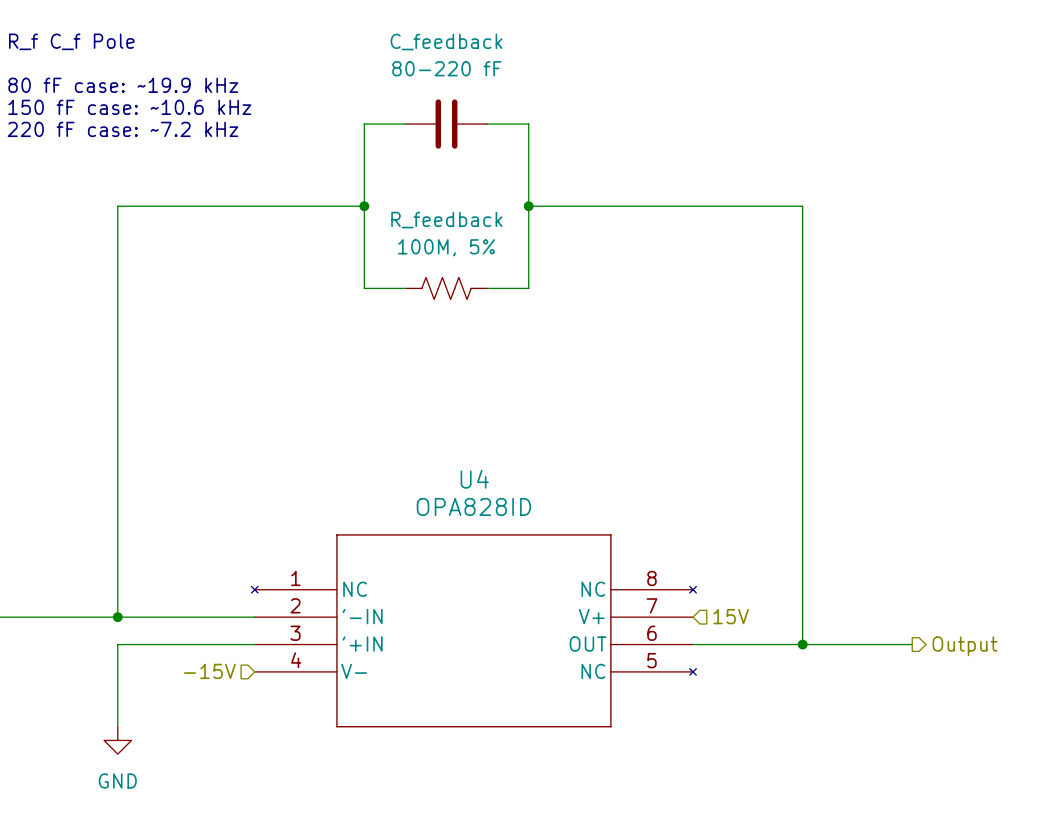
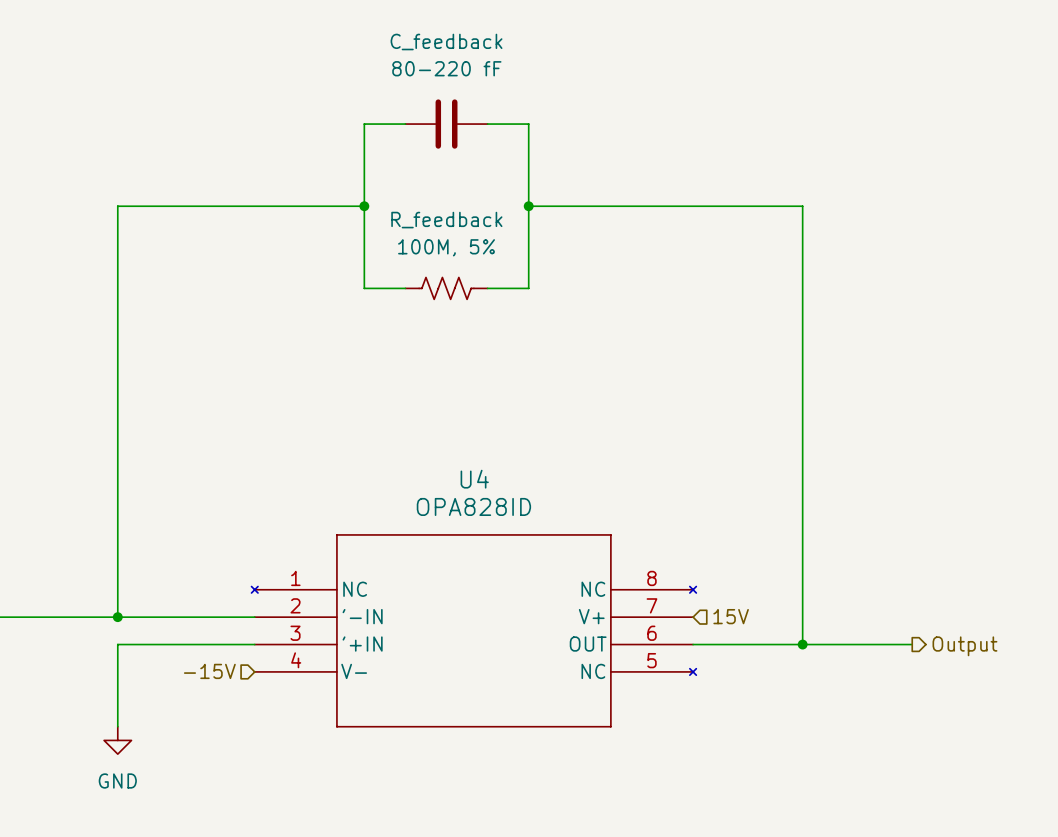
text: R_f C_f Pole (71, 41) -> none
text: 80 fF case: ~19.9 kHz (123, 85) -> none
text: 150 fF case: ~10.6 kHz (129, 107) -> none
text: 220 fF case: ~7.2 kHz (122, 129) -> none

